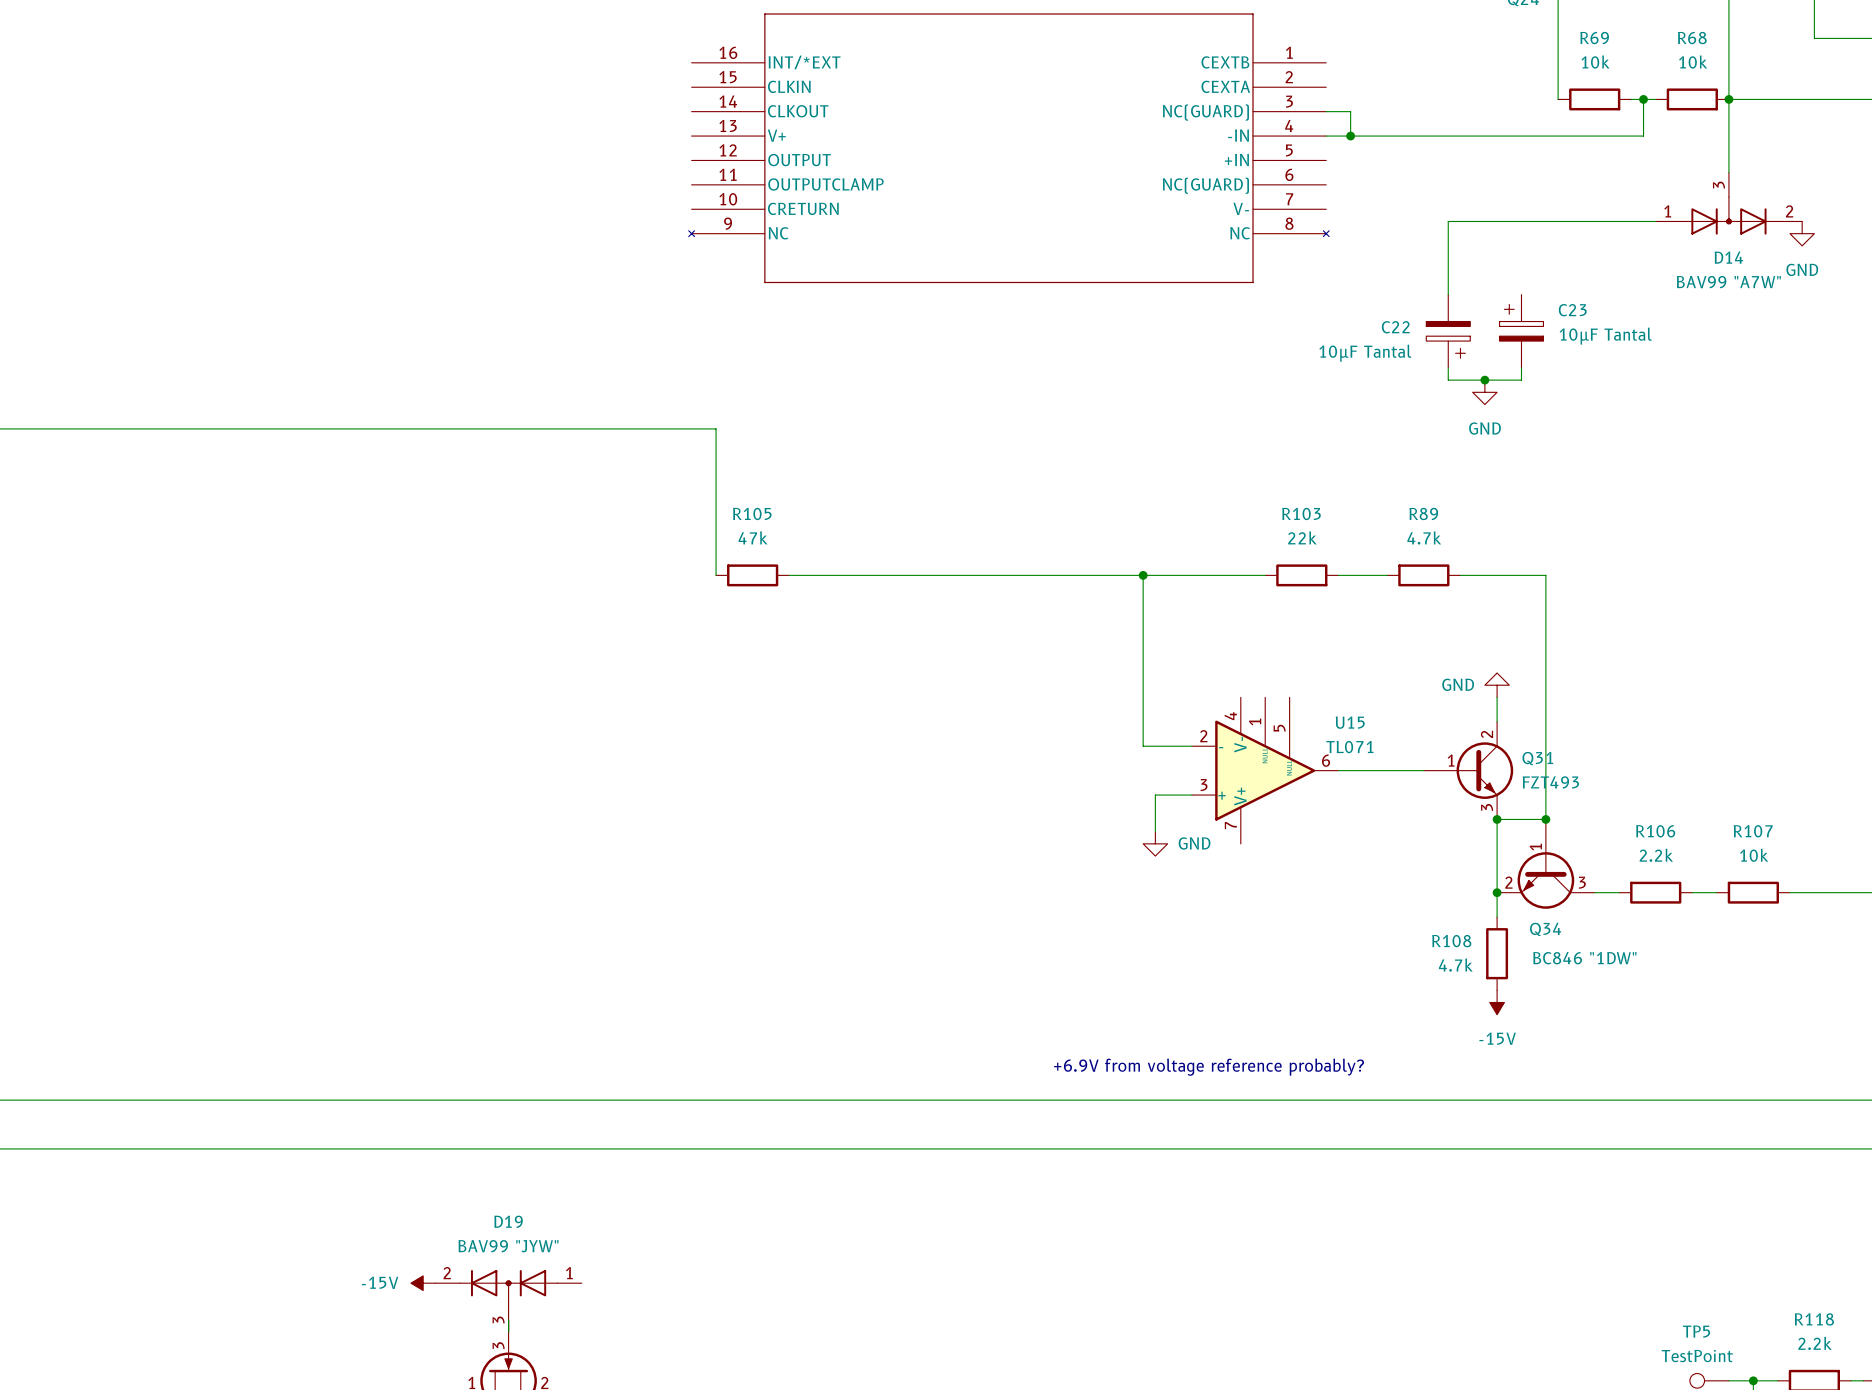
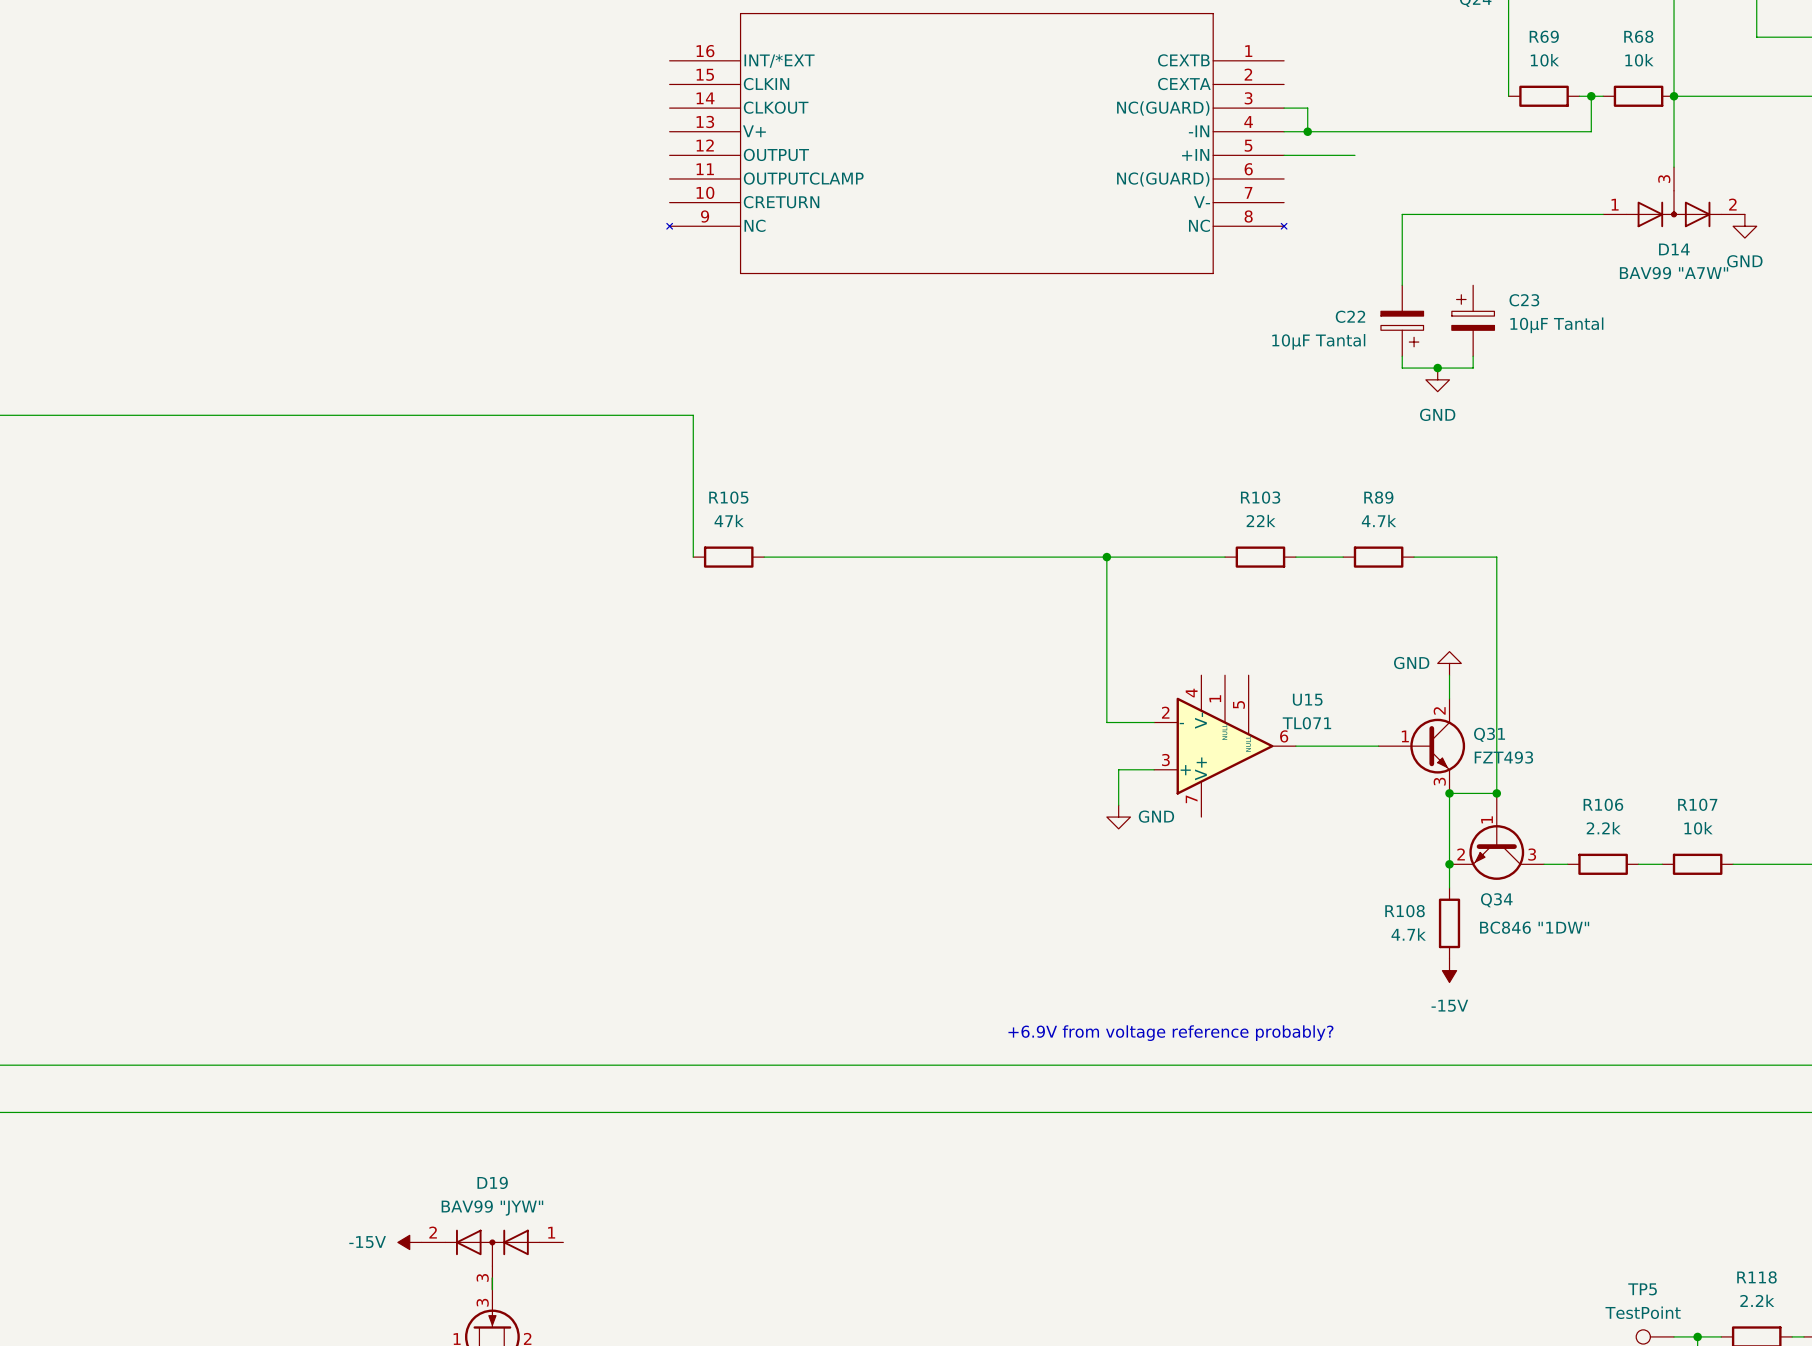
wire: none -> (1284, 155) (1354, 155)

